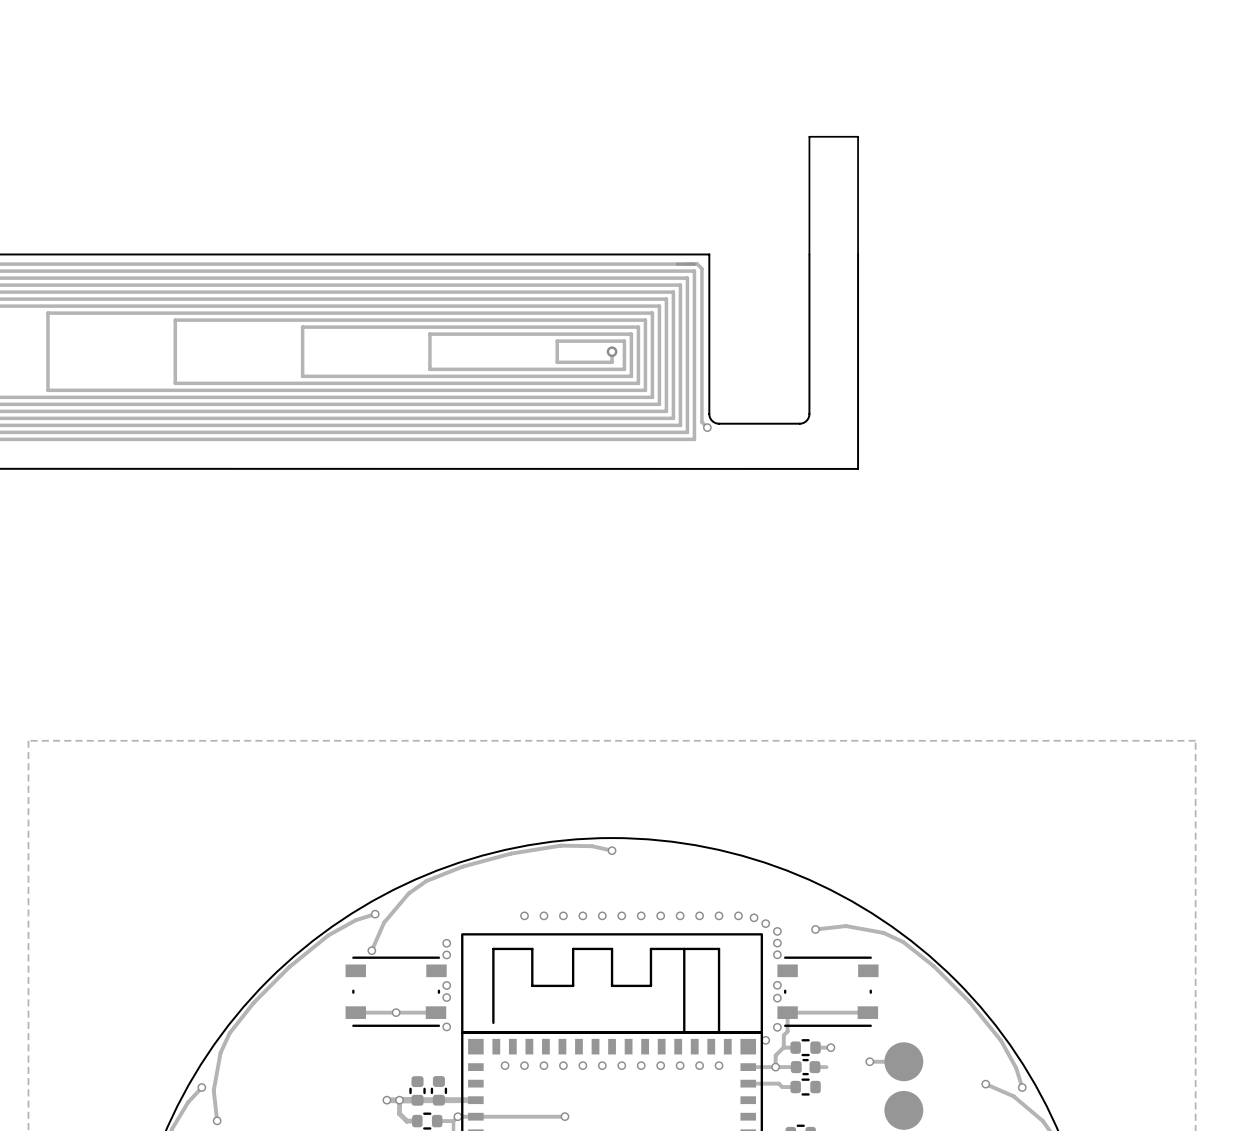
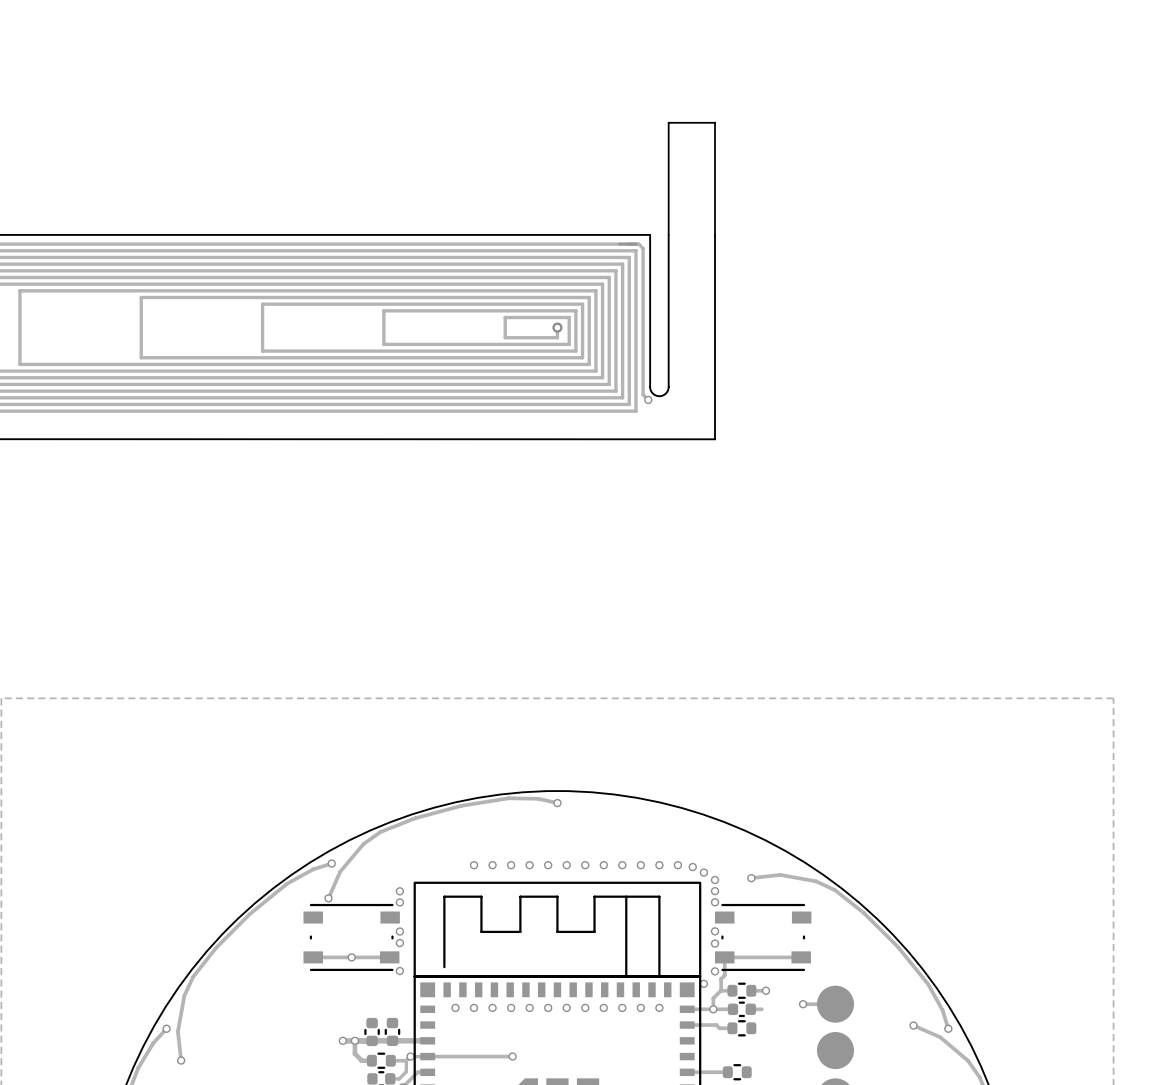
part position: (833, 195) -> (691, 178)
board edge: (809, 254) (807, 419) (799, 423) (719, 423) (712, 420) (709, 413) -> (668, 234) (668, 388) (665, 393) (659, 396) (652, 393) (650, 386)
board edge: (858, 254) (858, 468) (777, 468) -> (715, 234) (715, 439)

